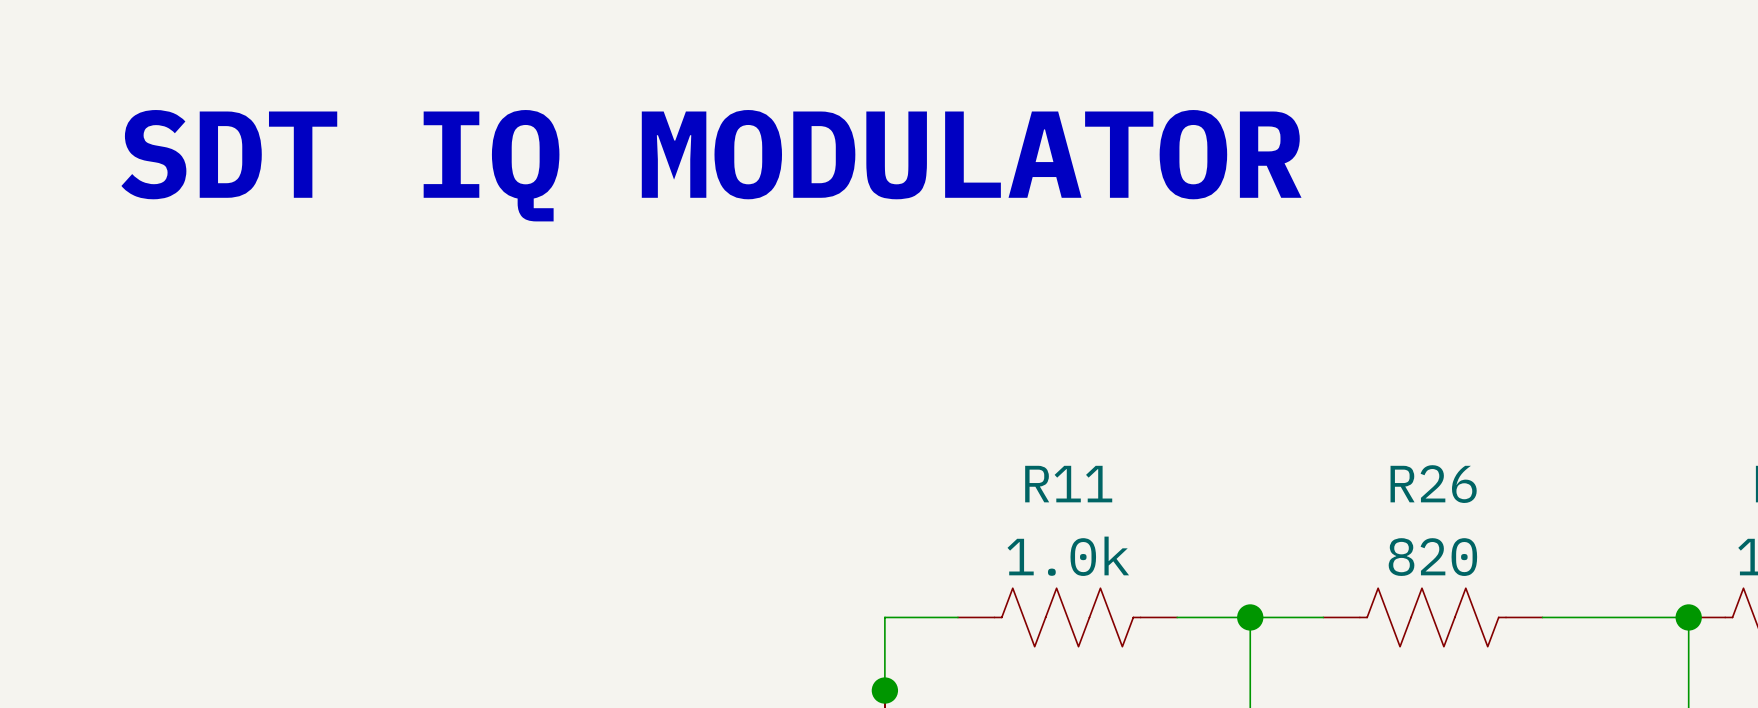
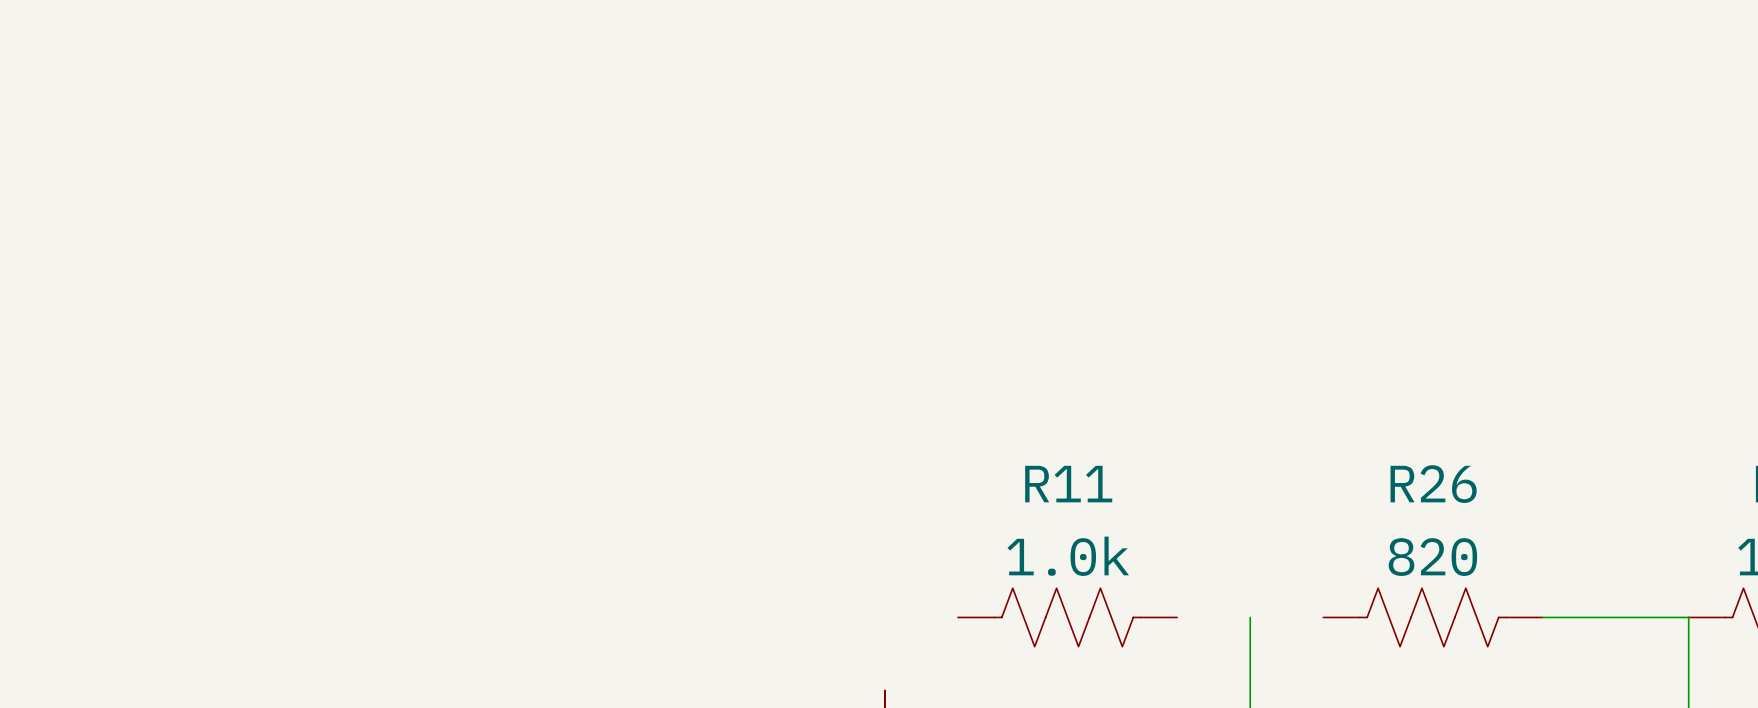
text: SDT IQ MODULATOR (711, 165) -> none
wire: (957, 617) (884, 617) (884, 690) -> none
wire: (1177, 617) (1323, 617) -> none
junction: (1250, 617) -> none
junction: (1688, 617) -> none
junction: (884, 690) -> none

